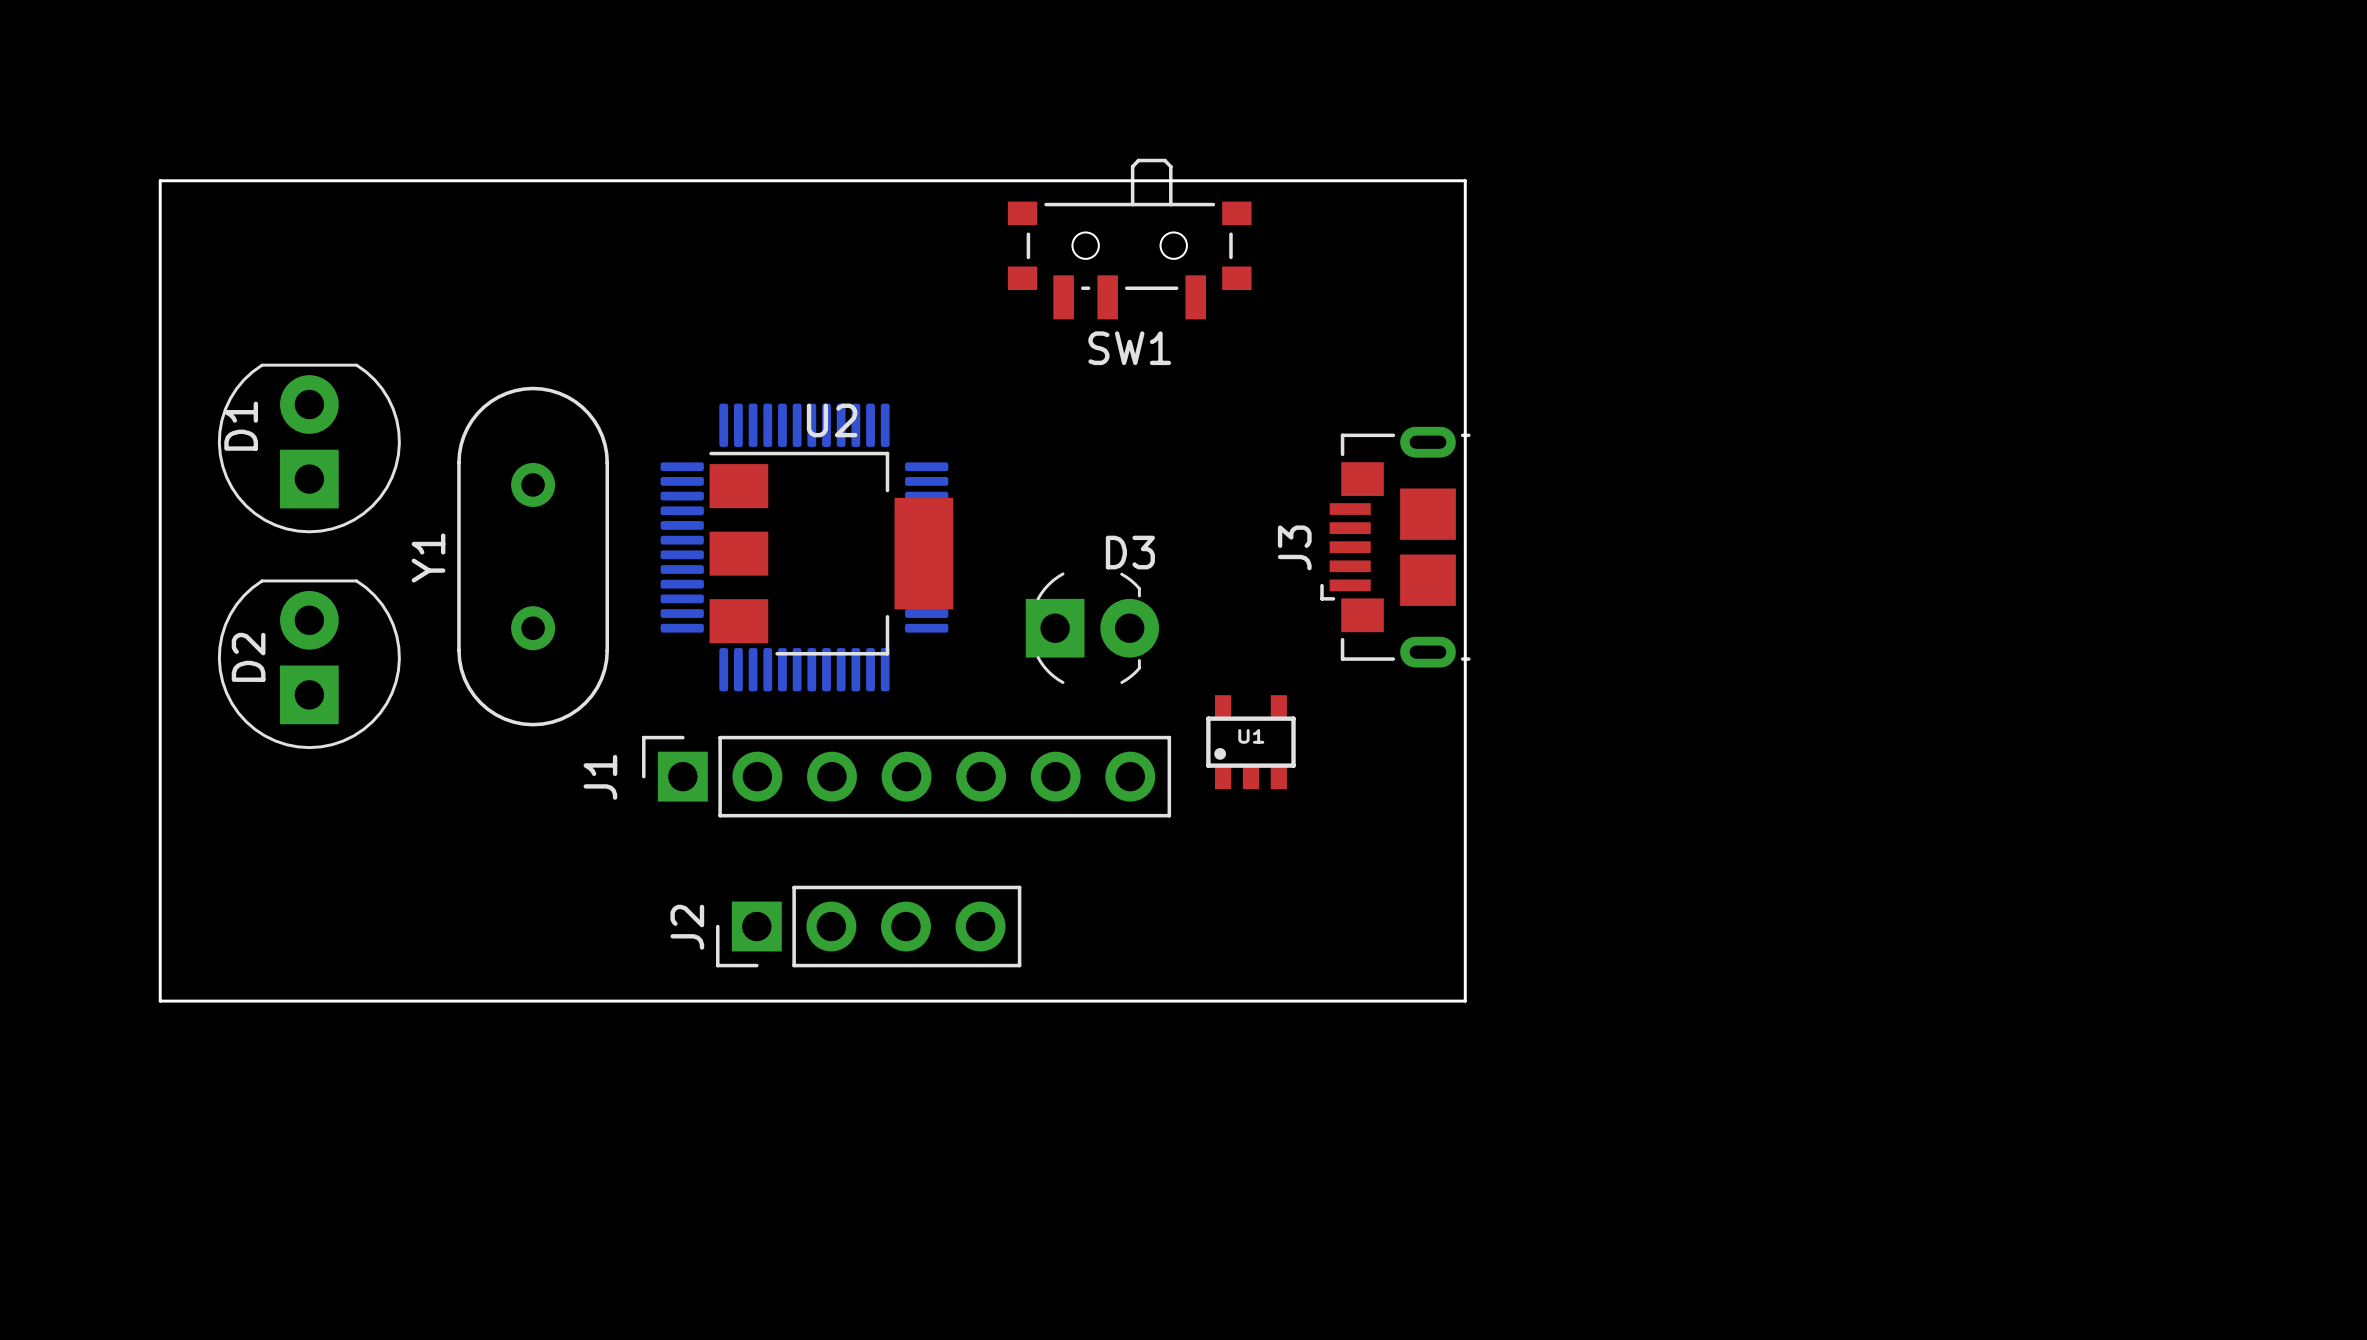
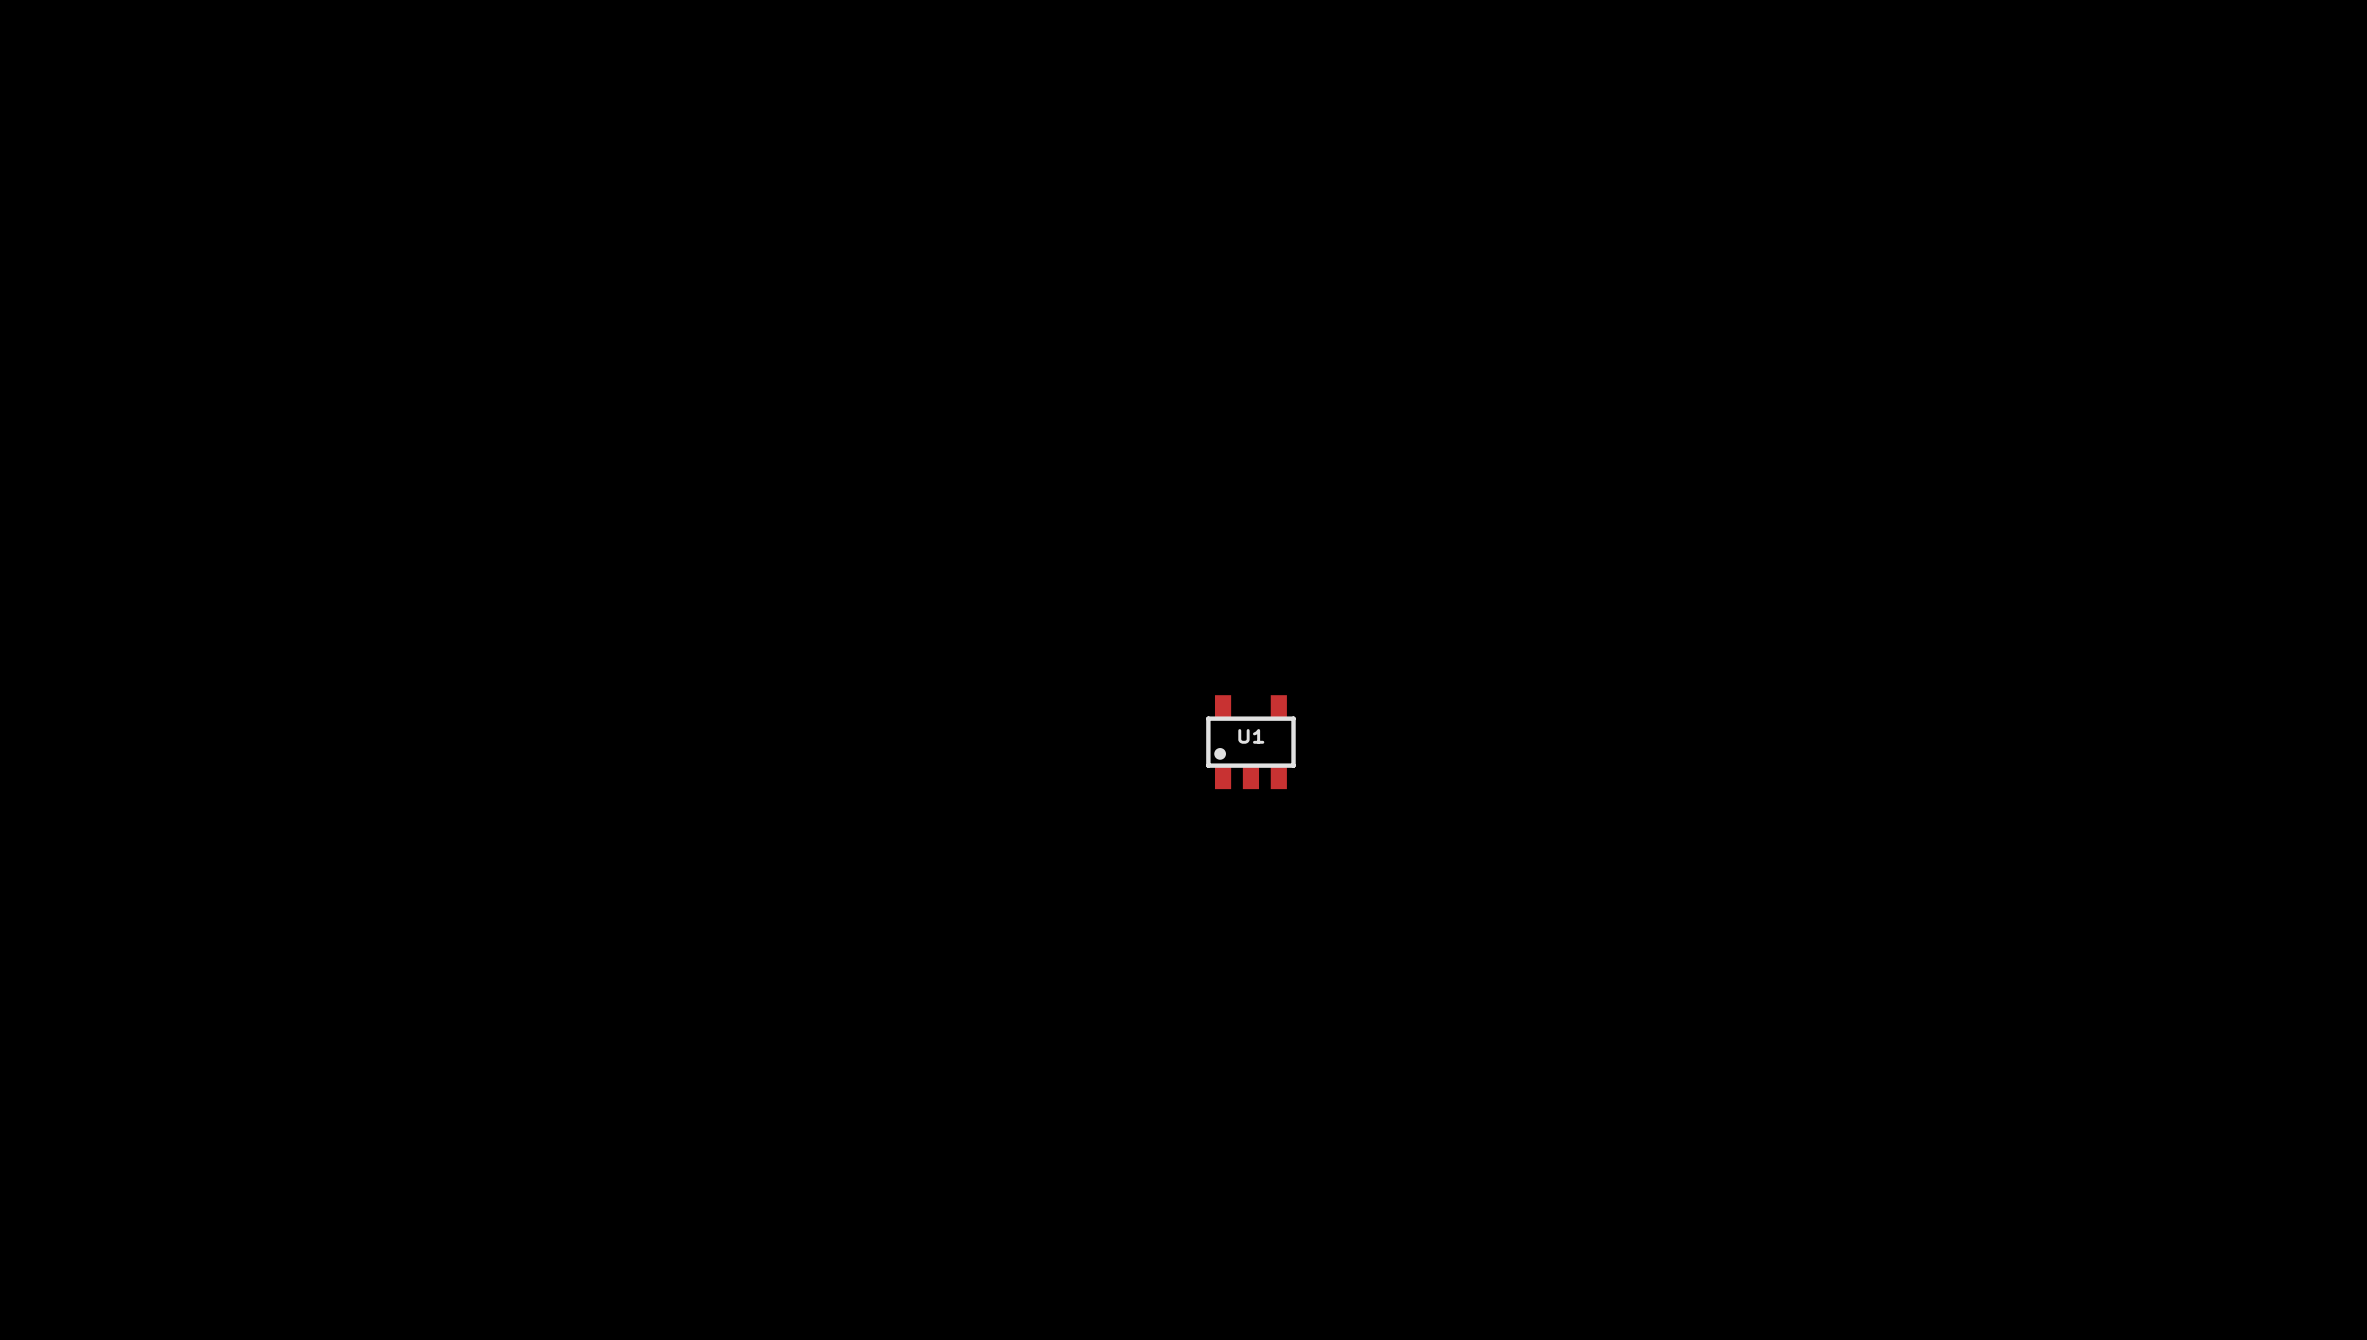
board edge: (160, 180) (1465, 180) (1465, 1001) (160, 1001) (160, 180) -> none
SW1: (1129, 239) -> none
D1: (309, 448) -> none
part: (804, 547) -> none
J3: (1395, 547) -> none
U2: (831, 553) -> none
Y1: (533, 556) -> none
D3: (1092, 628) -> none
D2: (309, 664) -> none
J1: (906, 776) -> none
J2: (868, 926) -> none

